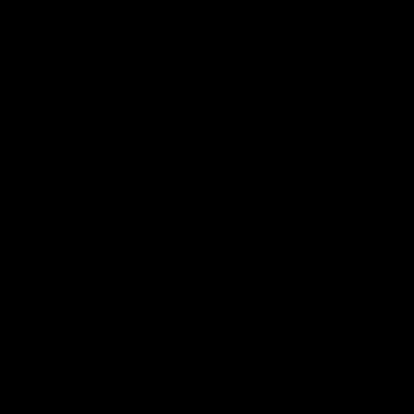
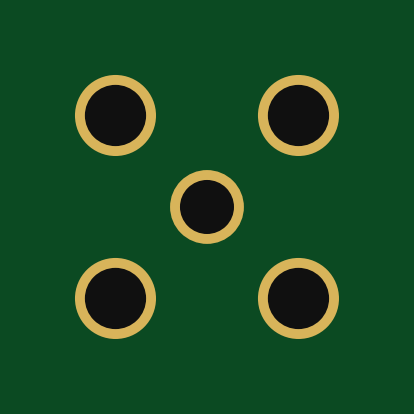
part: none -> (206, 206)

